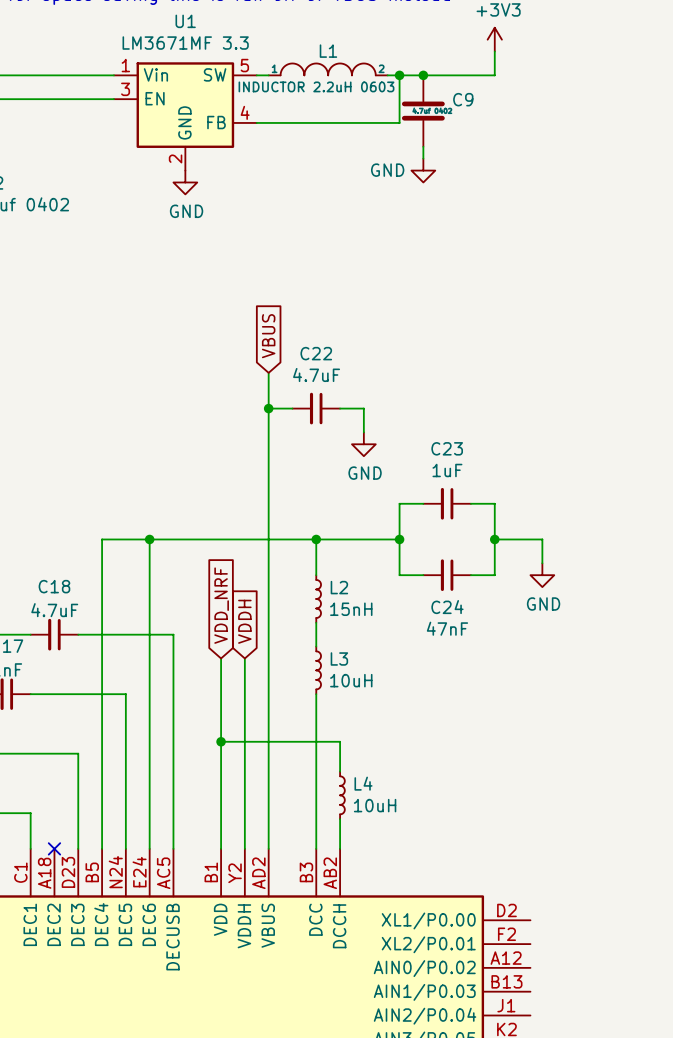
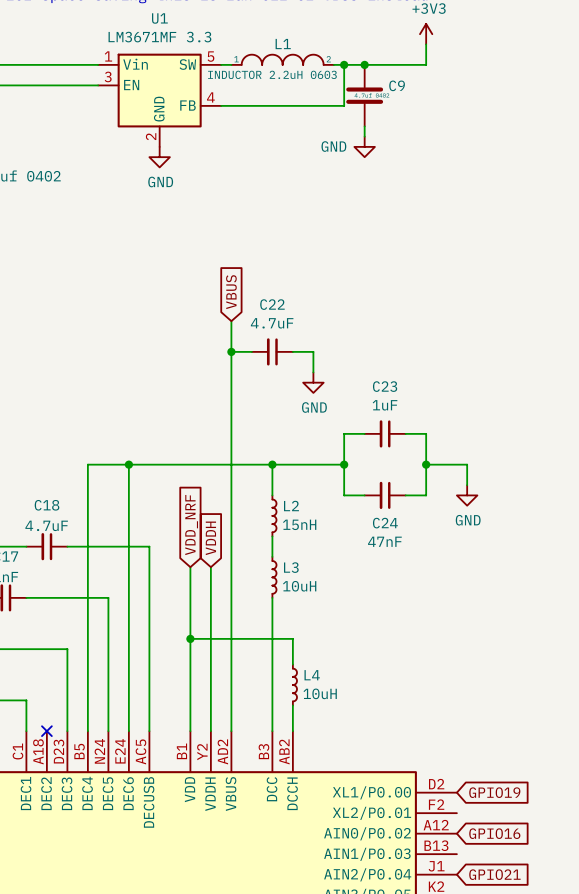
global label: none -> GPIO19 (494, 792)
global label: none -> GPIO16 (494, 833)
global label: none -> GPIO21 (494, 874)

